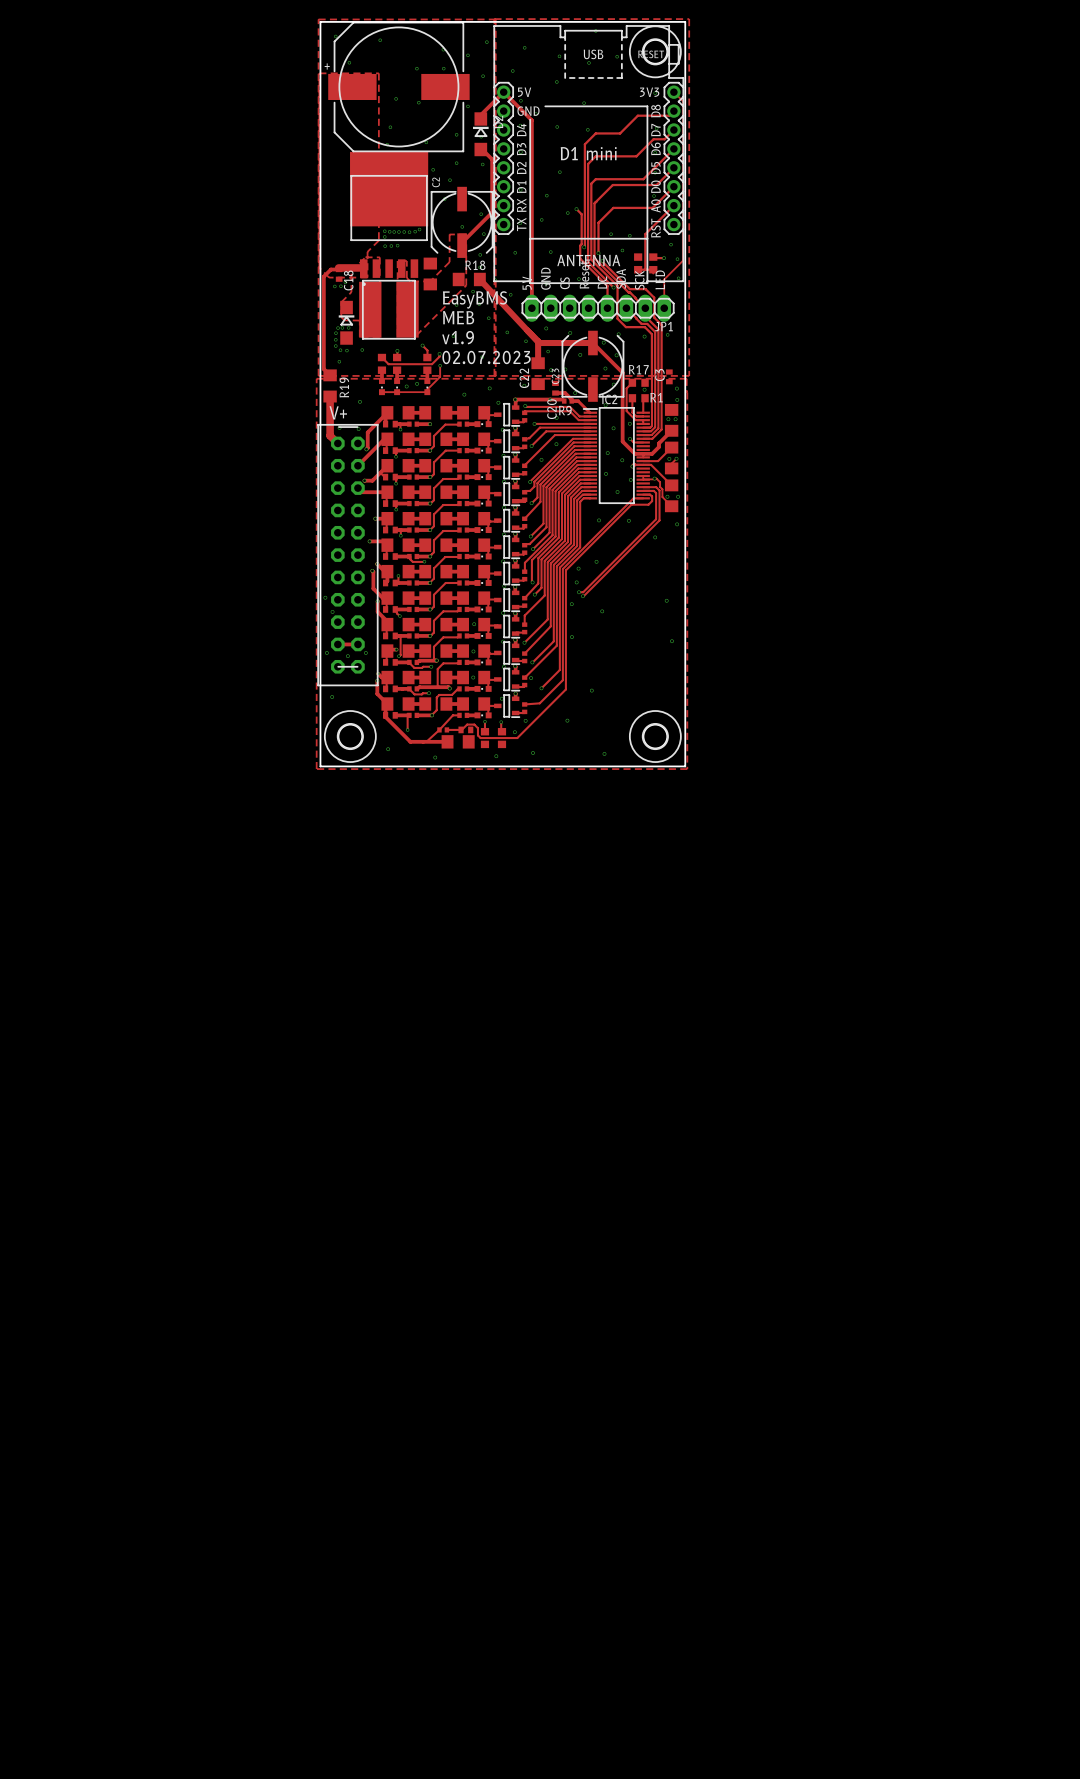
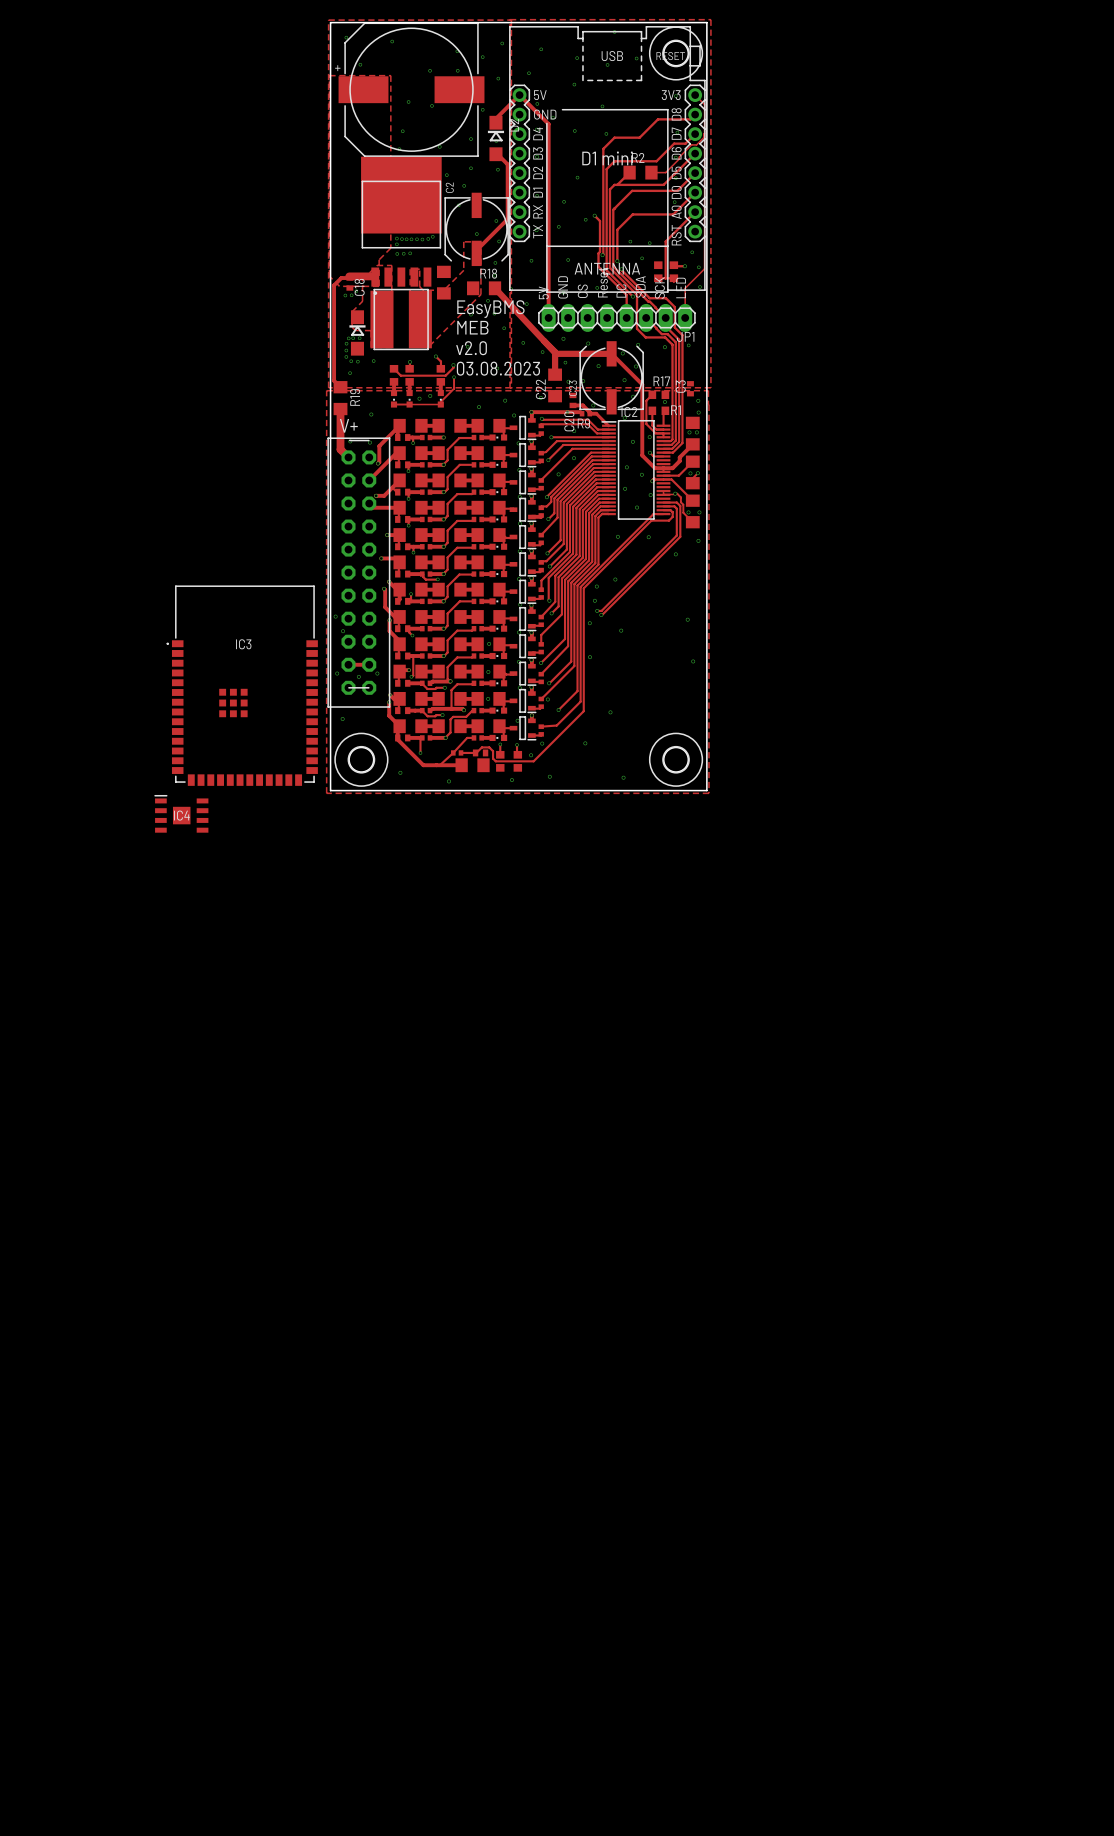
track: none -> (704, 133) (703, 137) (696, 144) (691, 144) (665, 172) (651, 172)
track: none -> (629, 172) (617, 184)
R2: none -> (640, 172)
text: v1.9 (458, 337) -> v2.0 (471, 348)
text: 02.07.2023 (486, 357) -> 03.08.2023 (498, 368)
IC3: none -> (242, 685)
IC4: none -> (181, 813)

